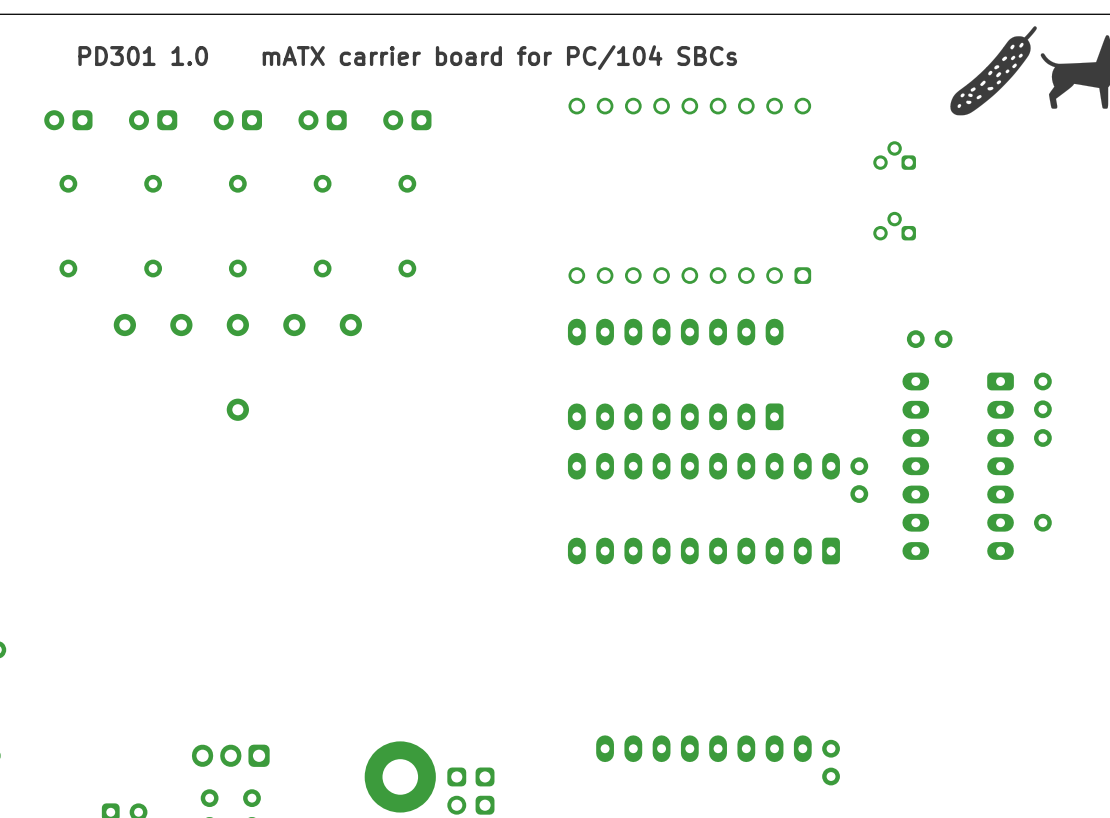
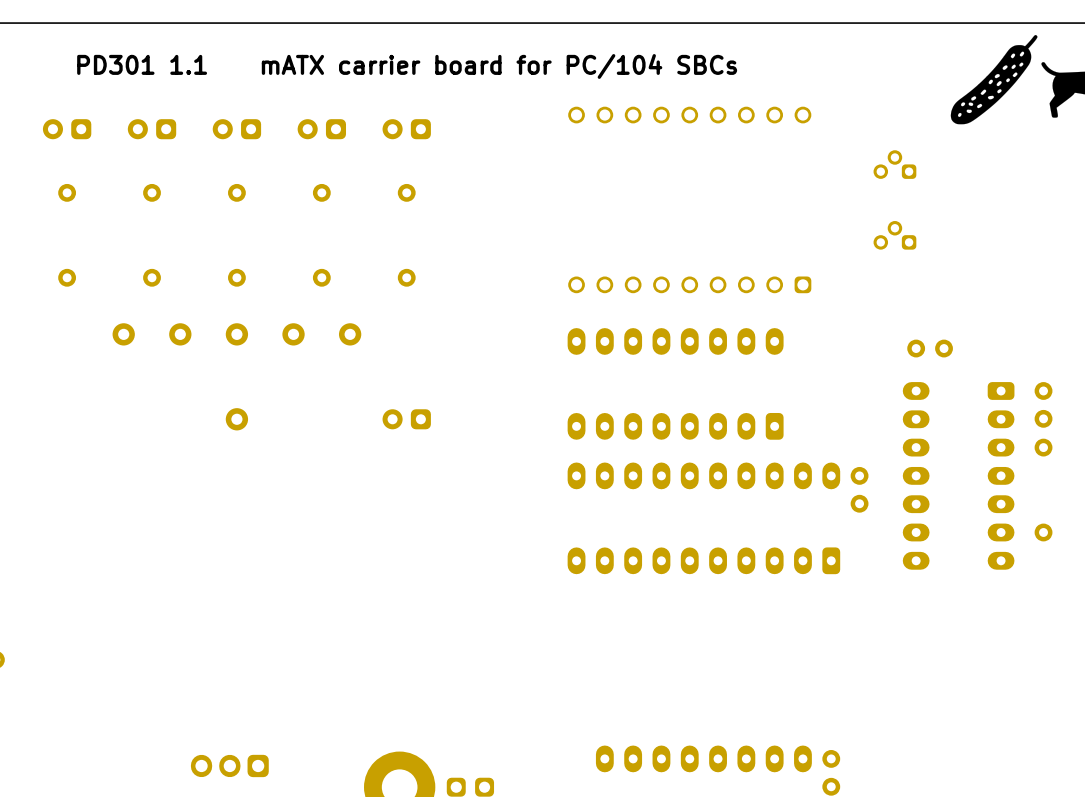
text: PD301 1.0 mATX carrier board for PC/104 SBCs (407, 57) -> PD301 1.1 mATX carrier board for PC/104 SBCs (407, 66)
part: none -> (406, 419)

